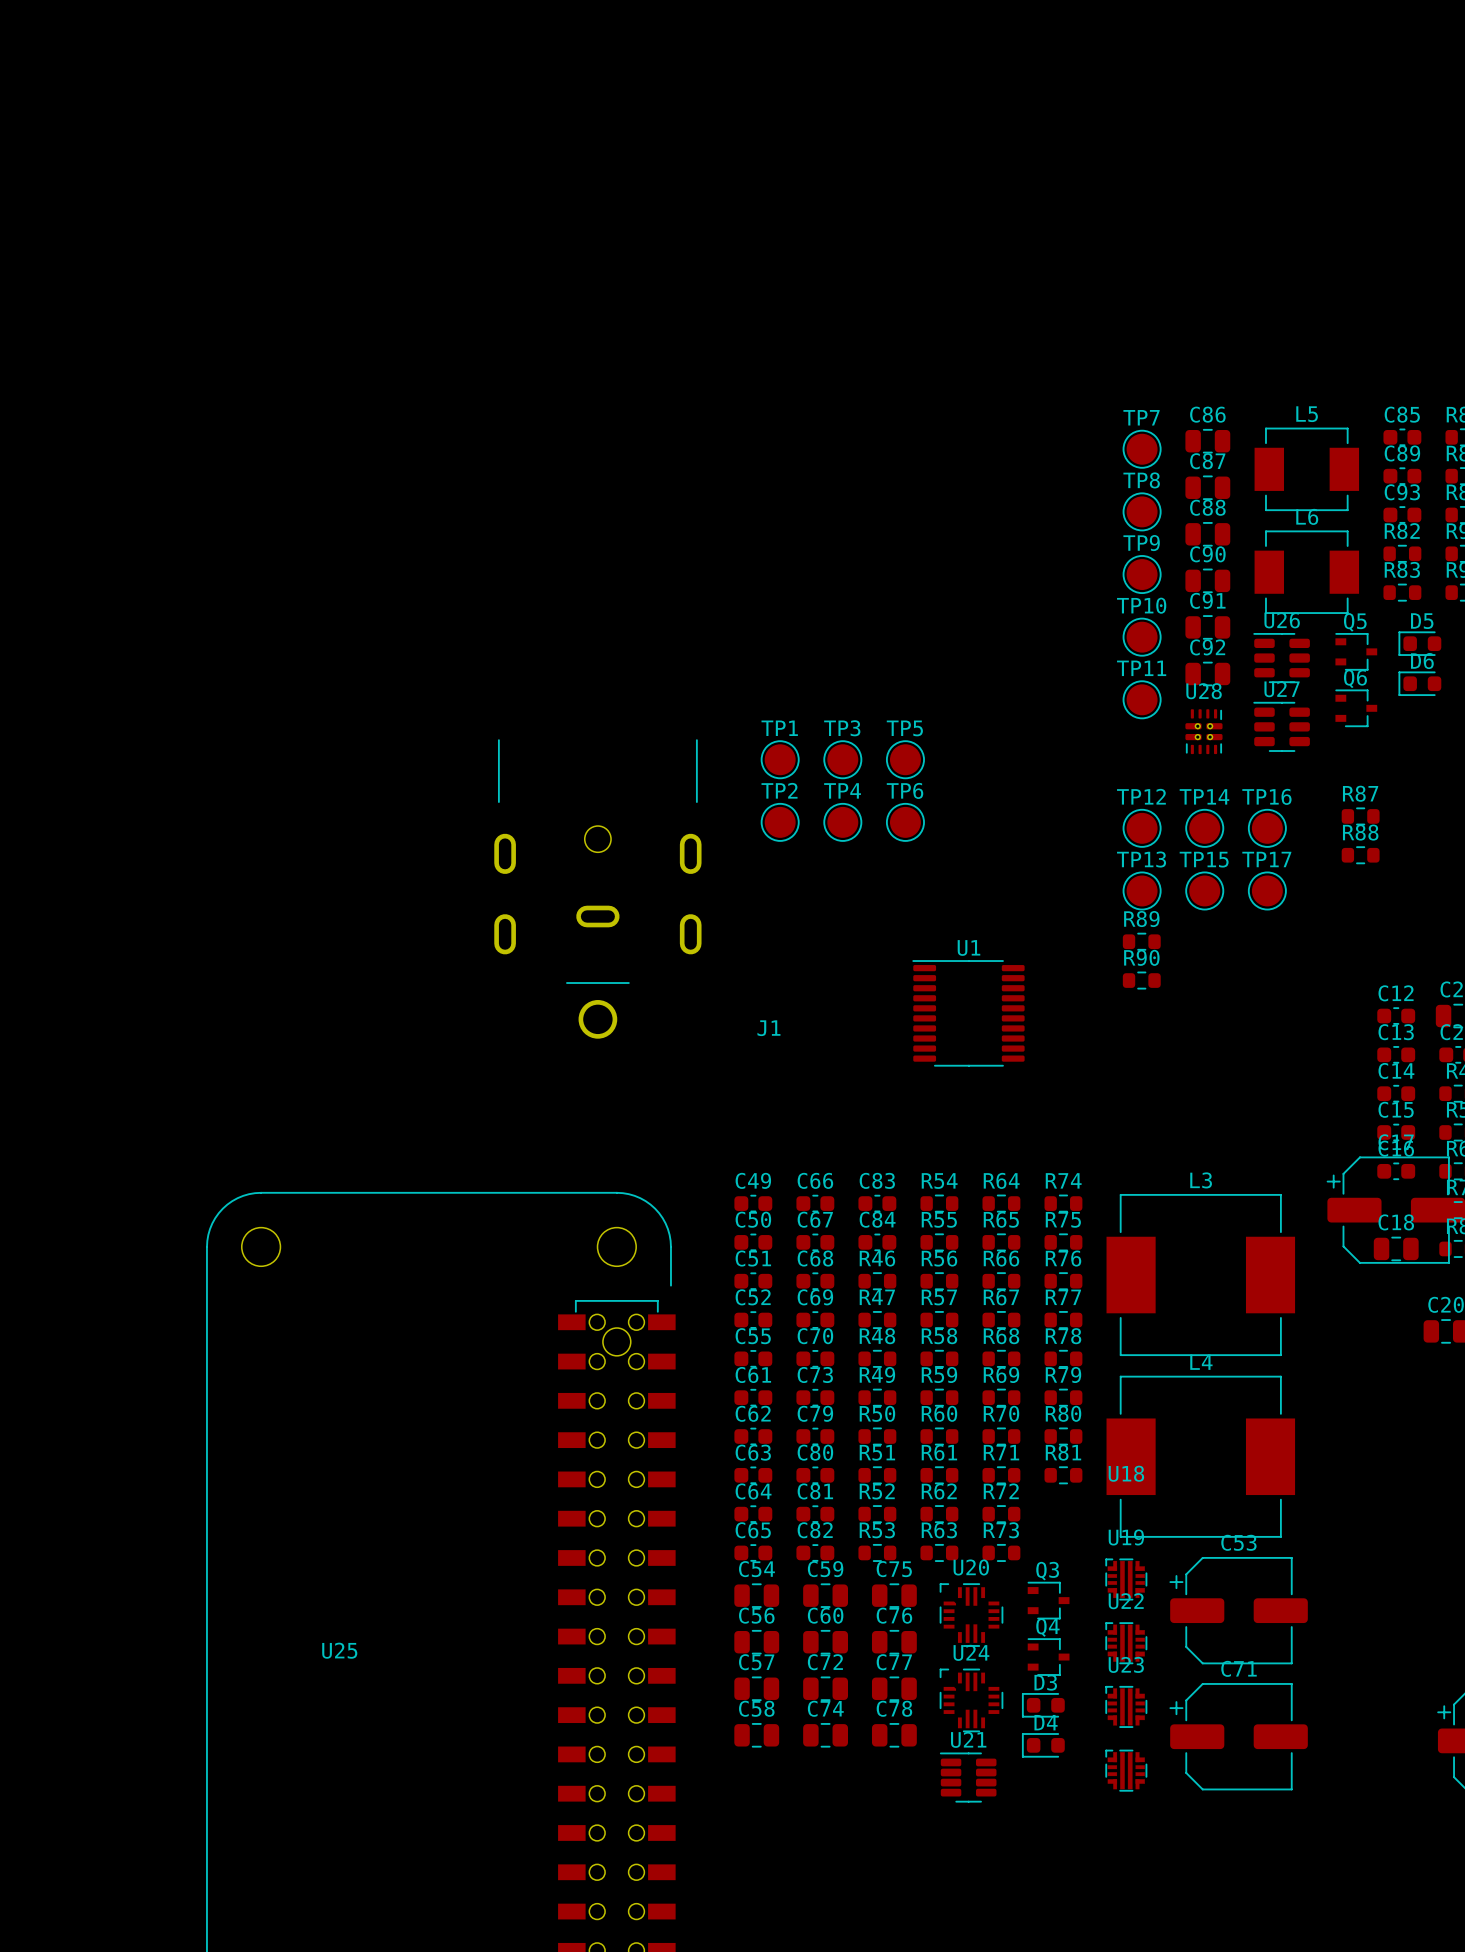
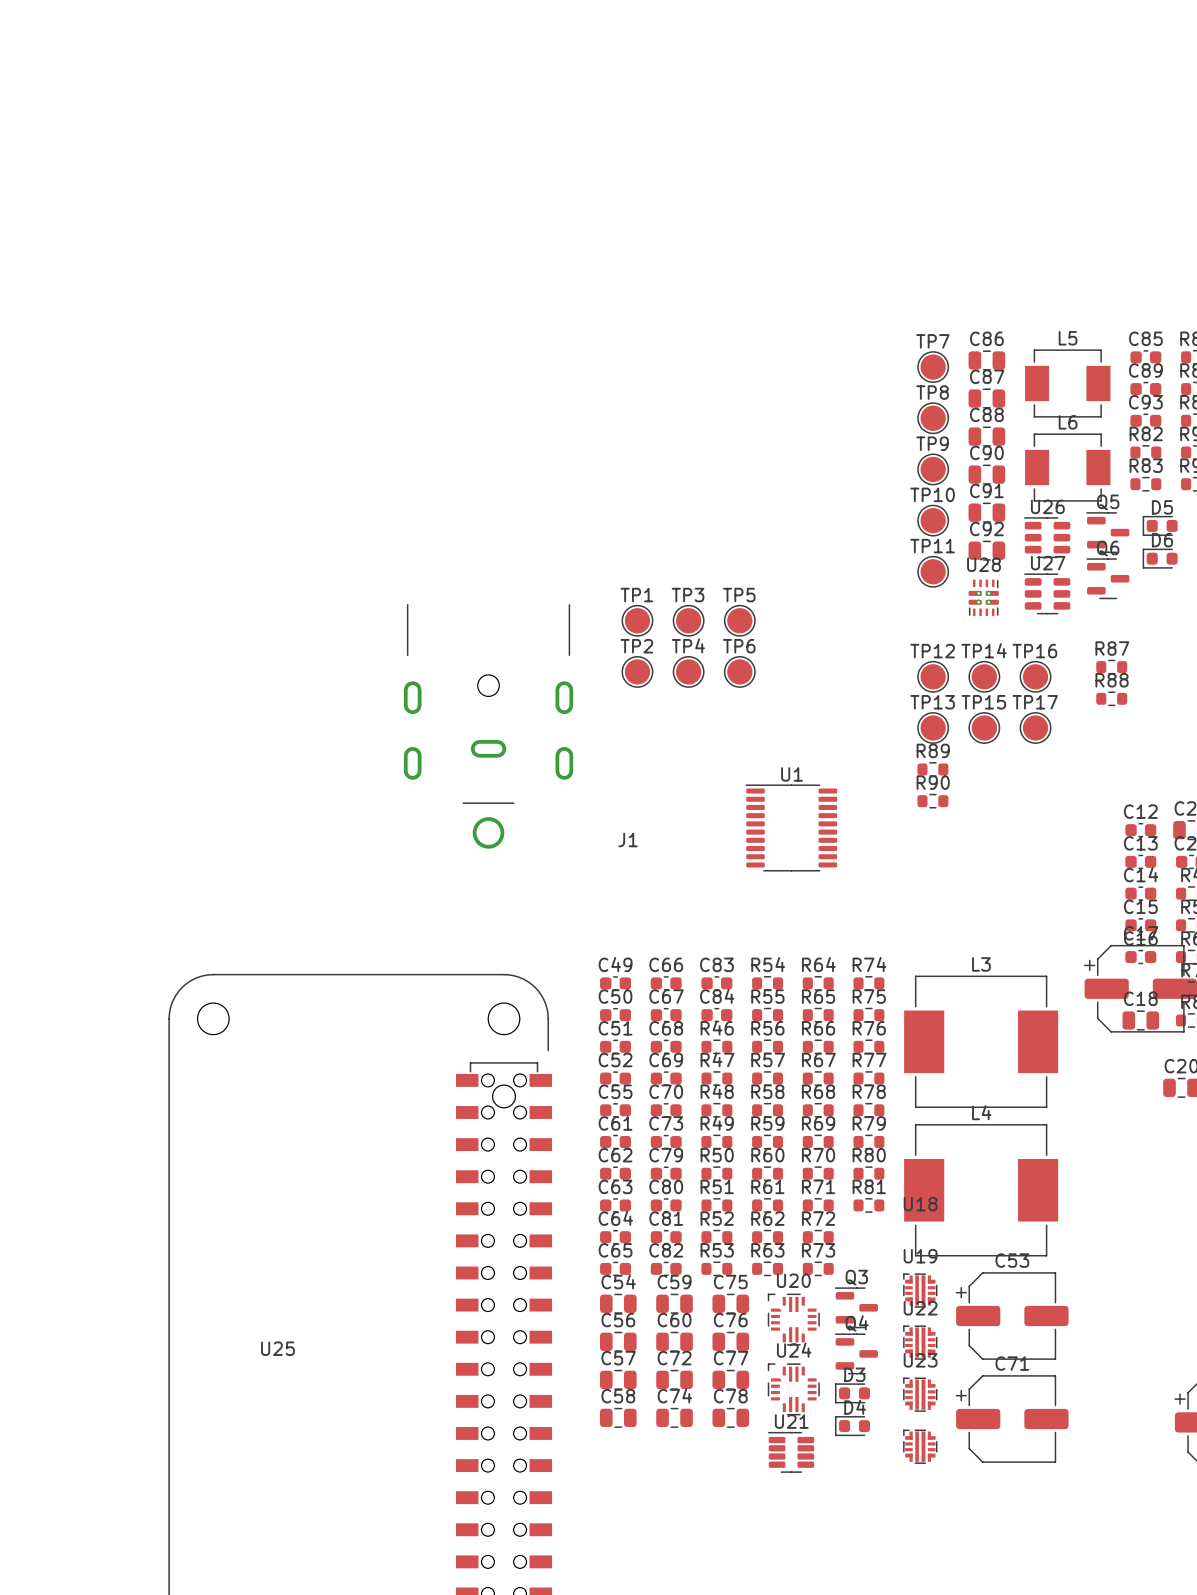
Q5 footprint: [1335, 632, 1378, 671] -> [1086, 512, 1130, 554]
Q6 footprint: [1335, 689, 1378, 728] -> [1086, 558, 1130, 600]
Q3 footprint: [1027, 1581, 1070, 1620] -> [834, 1287, 878, 1329]
Q4 footprint: [1027, 1638, 1070, 1676] -> [834, 1333, 878, 1375]

